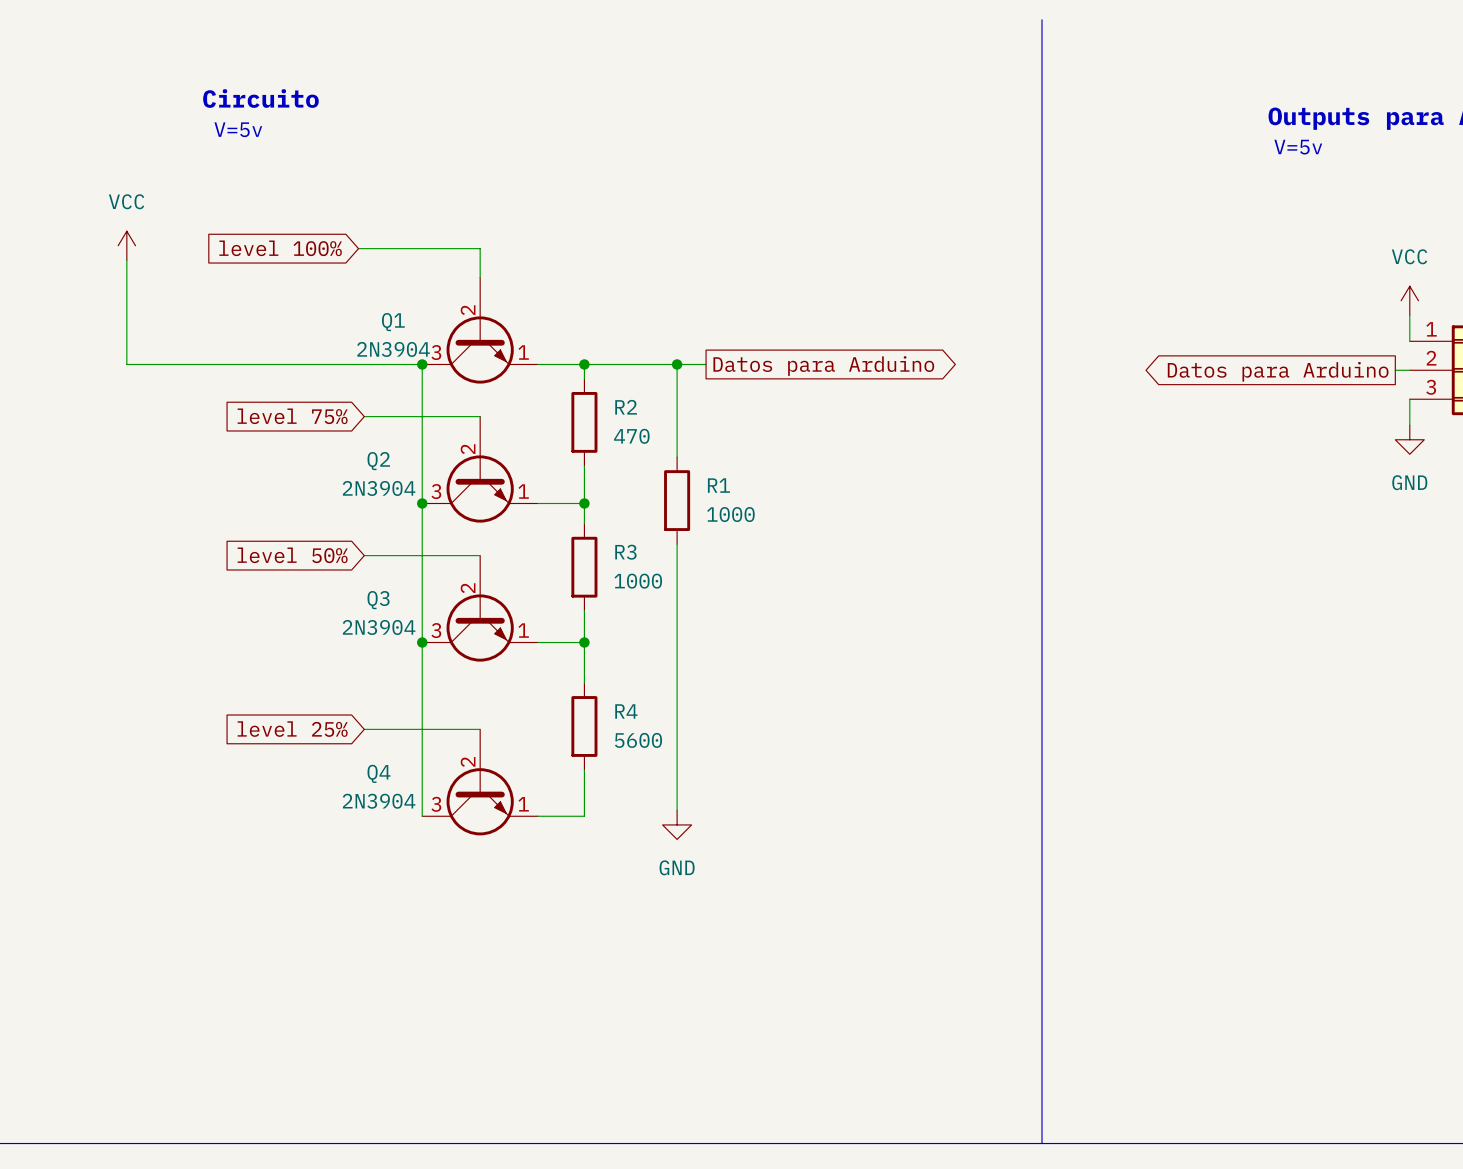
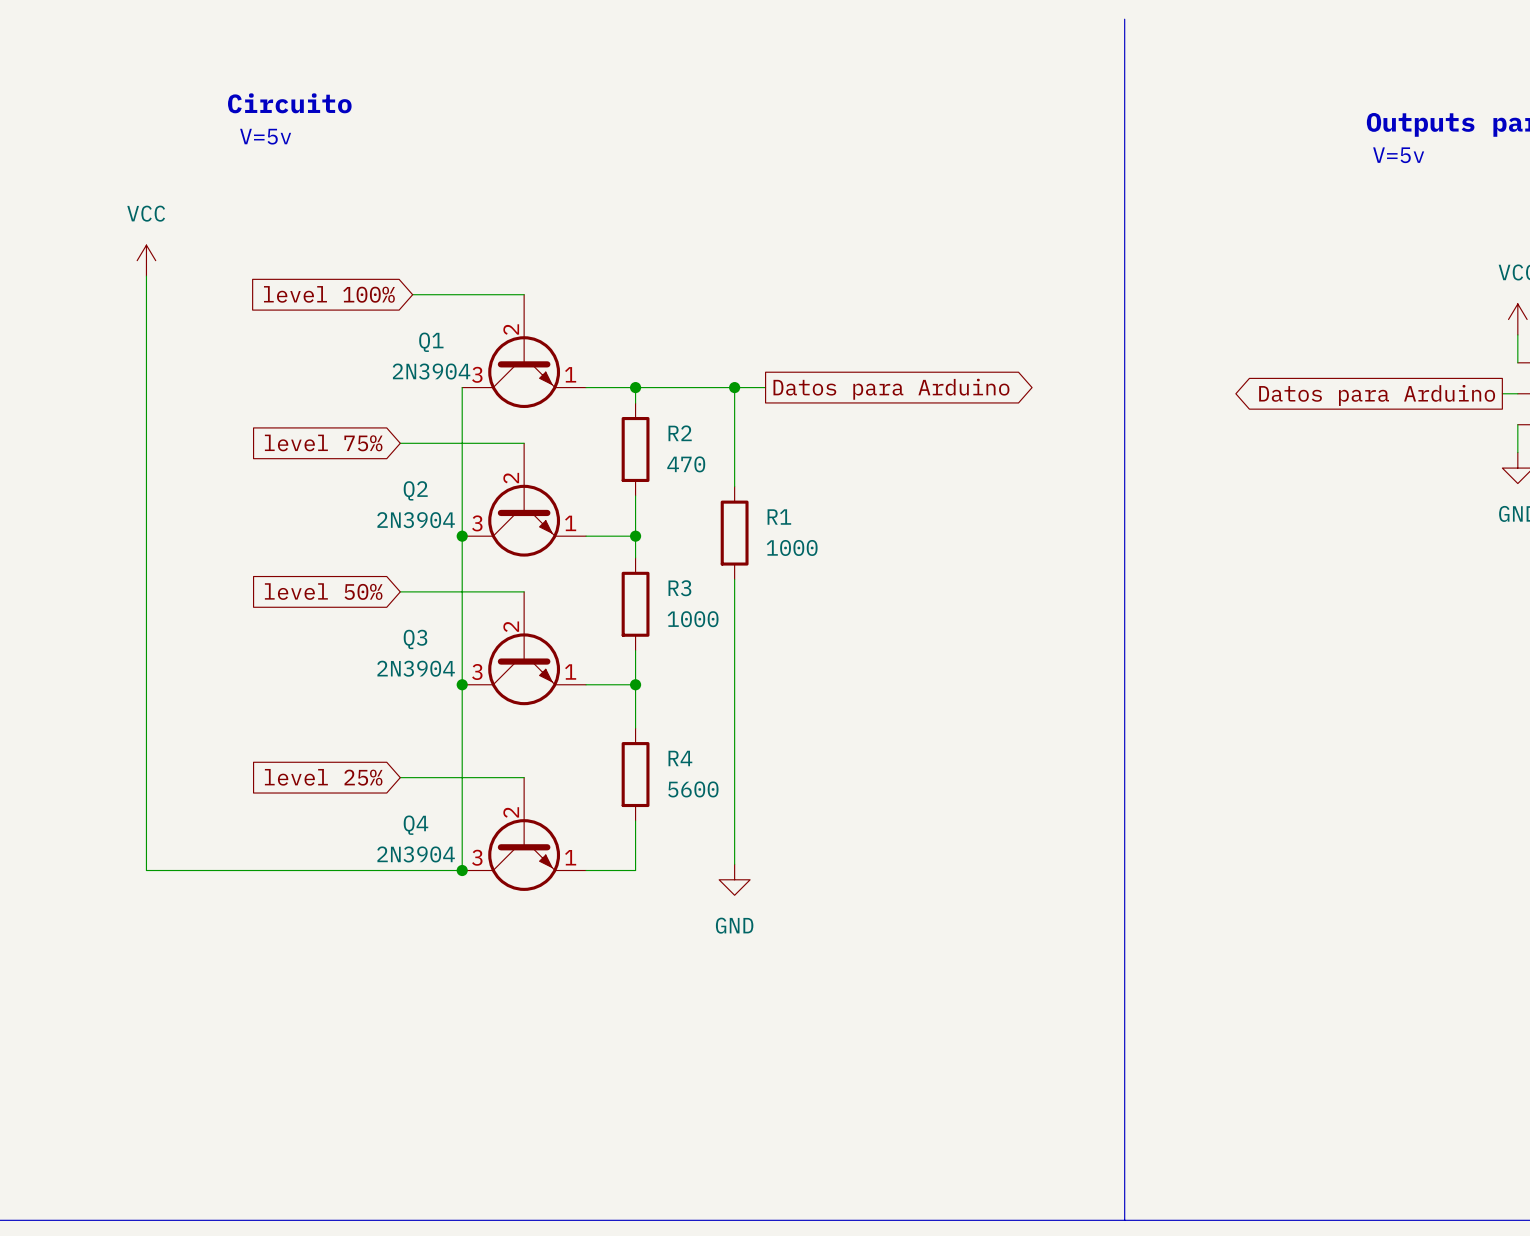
global label position: level 100% (280, 248) -> level 100% (329, 294)
wire: (358, 248) (480, 248) (480, 277) -> (412, 294) (524, 294)
wire: (126, 364) (422, 364) -> (146, 387) (146, 870) (462, 870)
junction: (422, 364) -> none
junction: none -> (462, 870)

